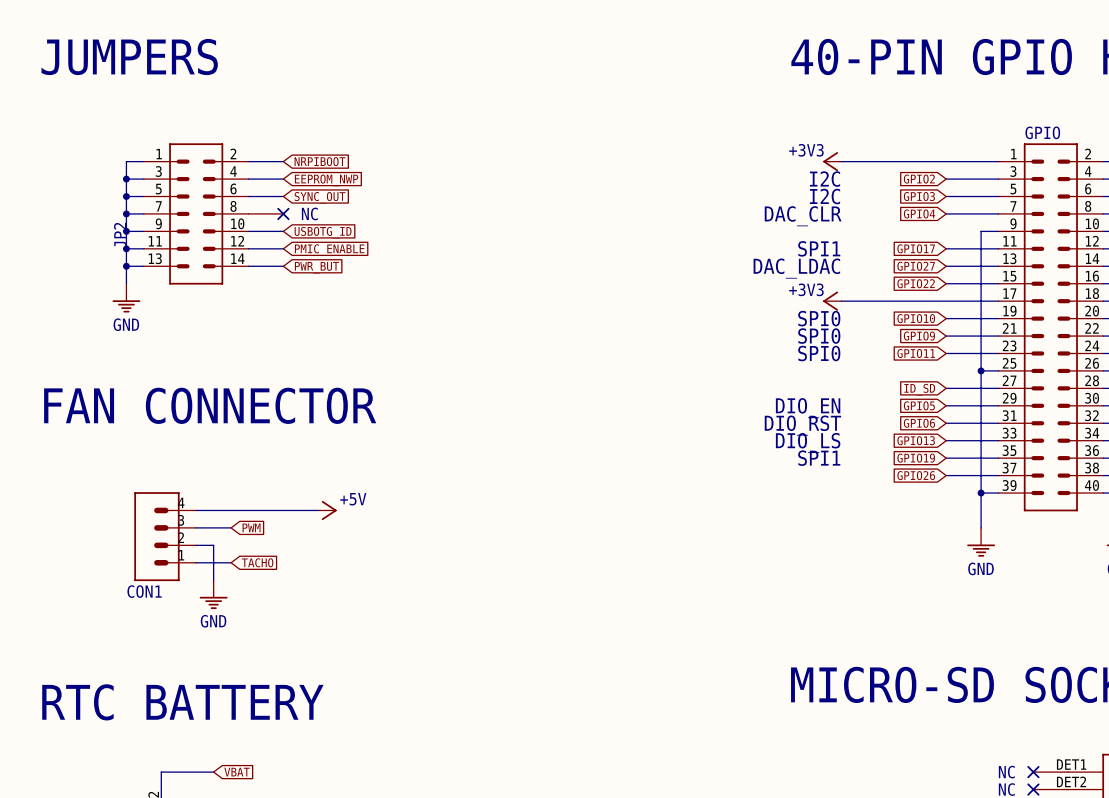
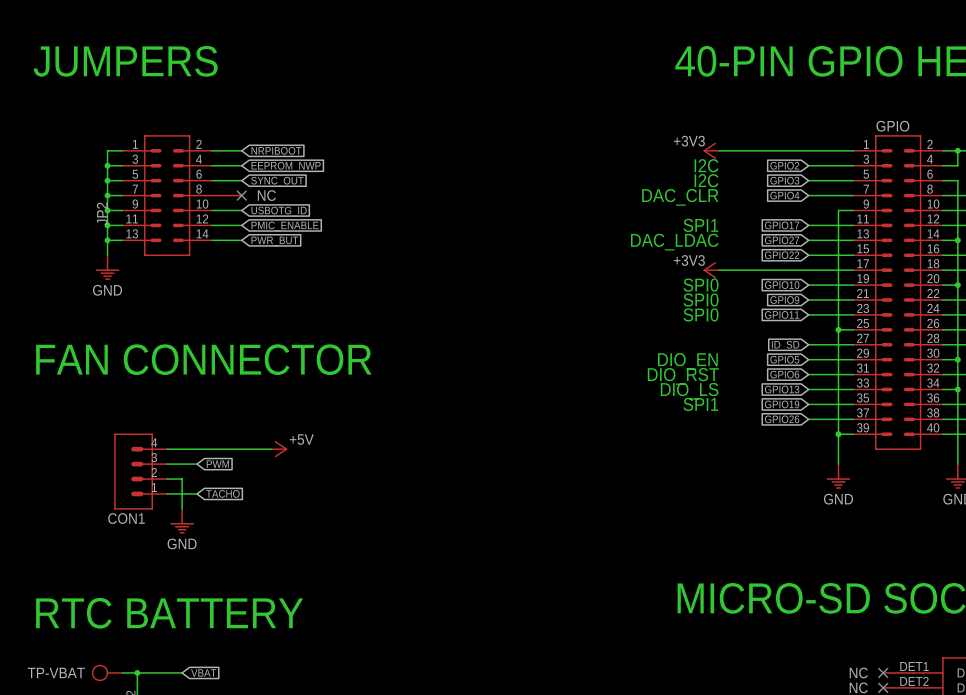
TP-VBAT: none -> (107, 672)
wire: none -> (122, 672) (137, 672)
junction: none -> (137, 672)

